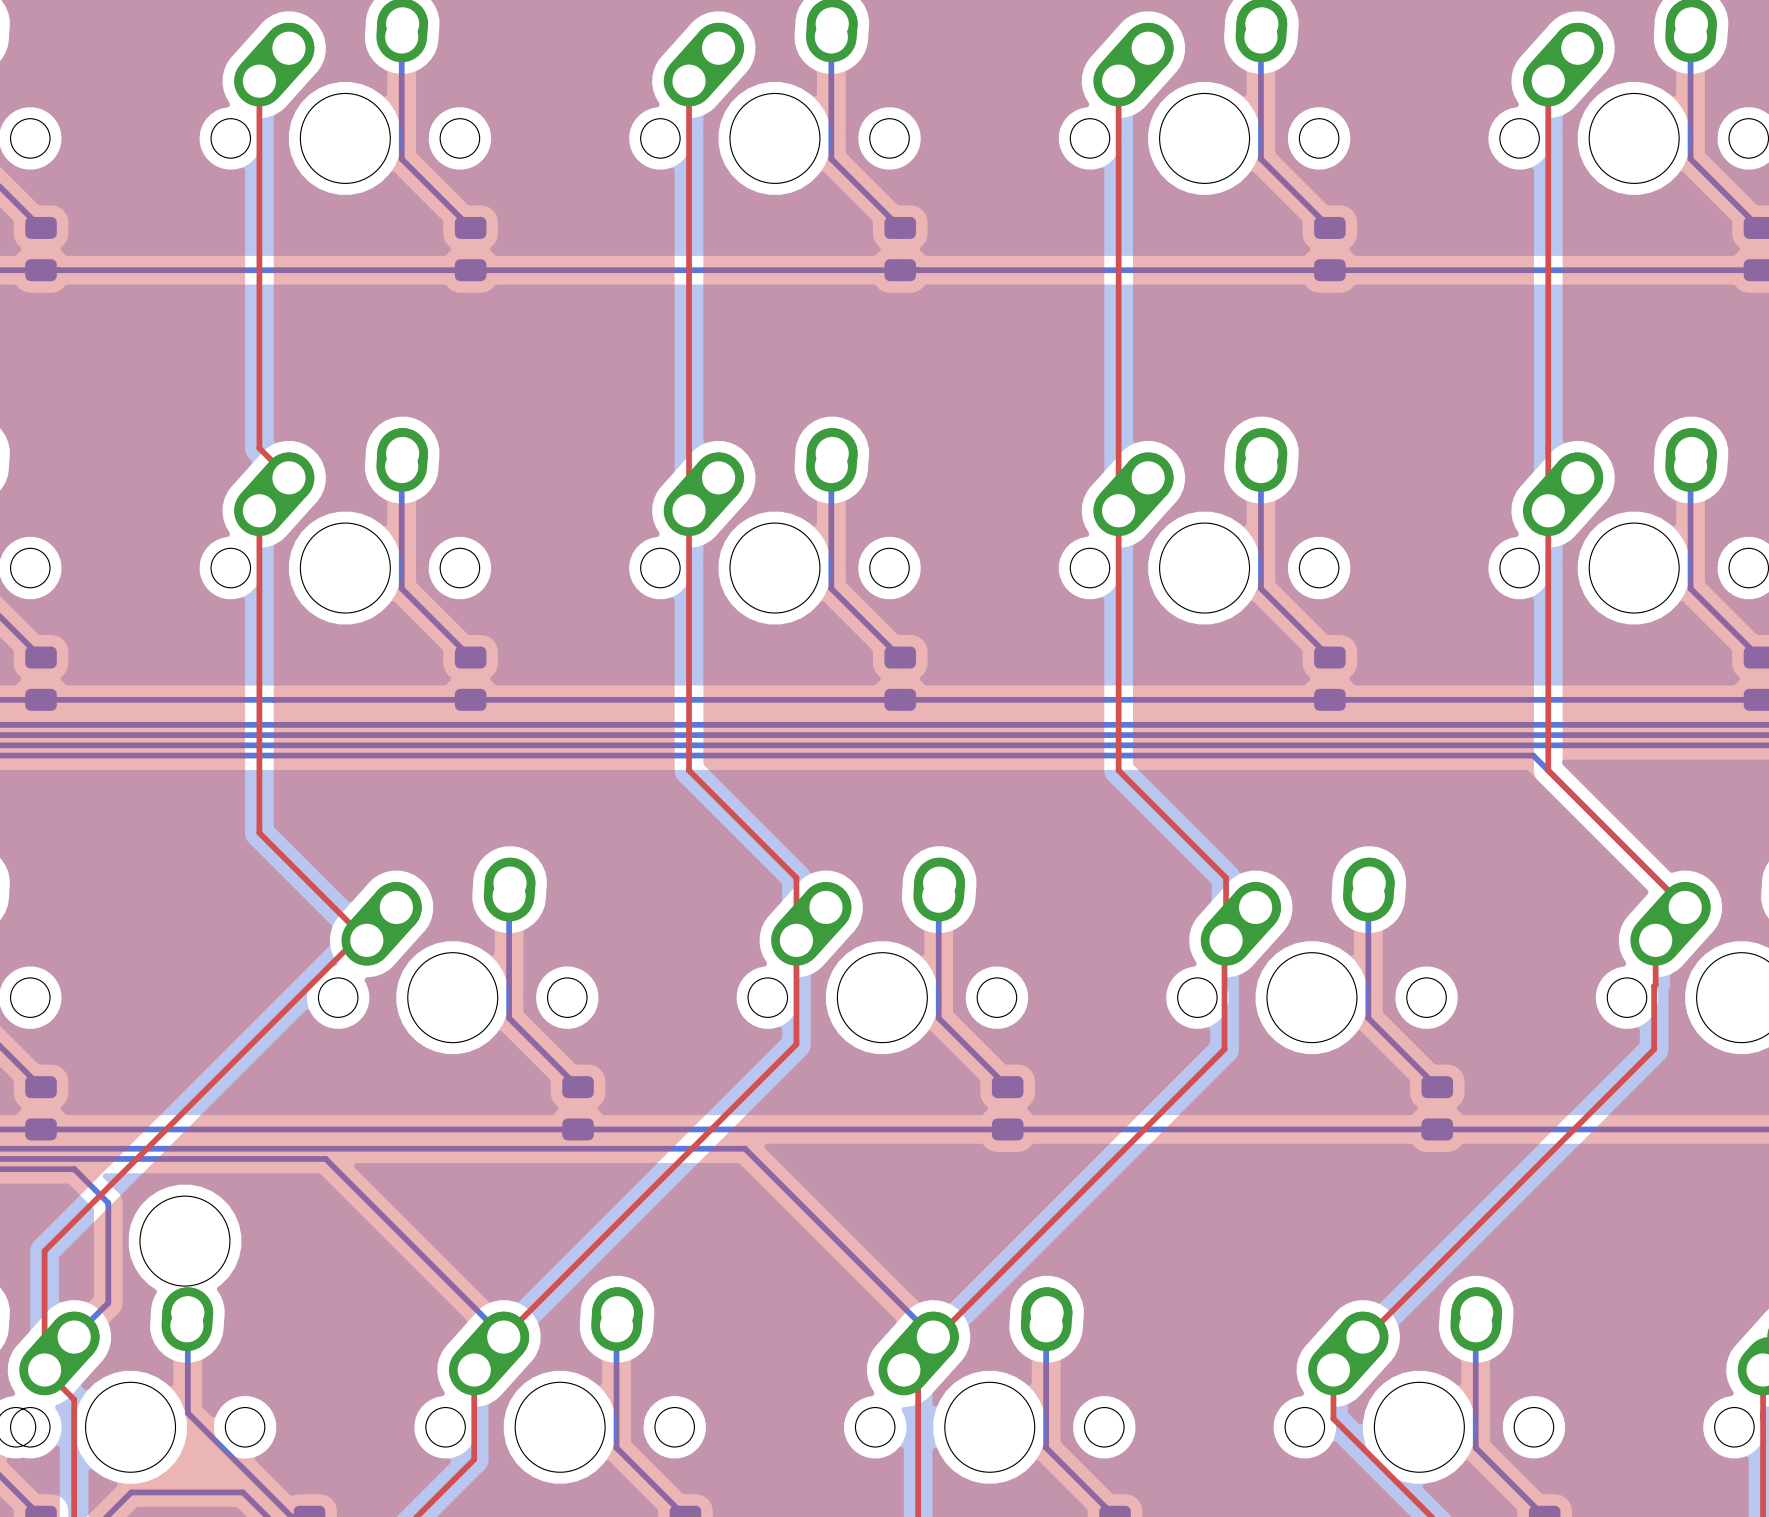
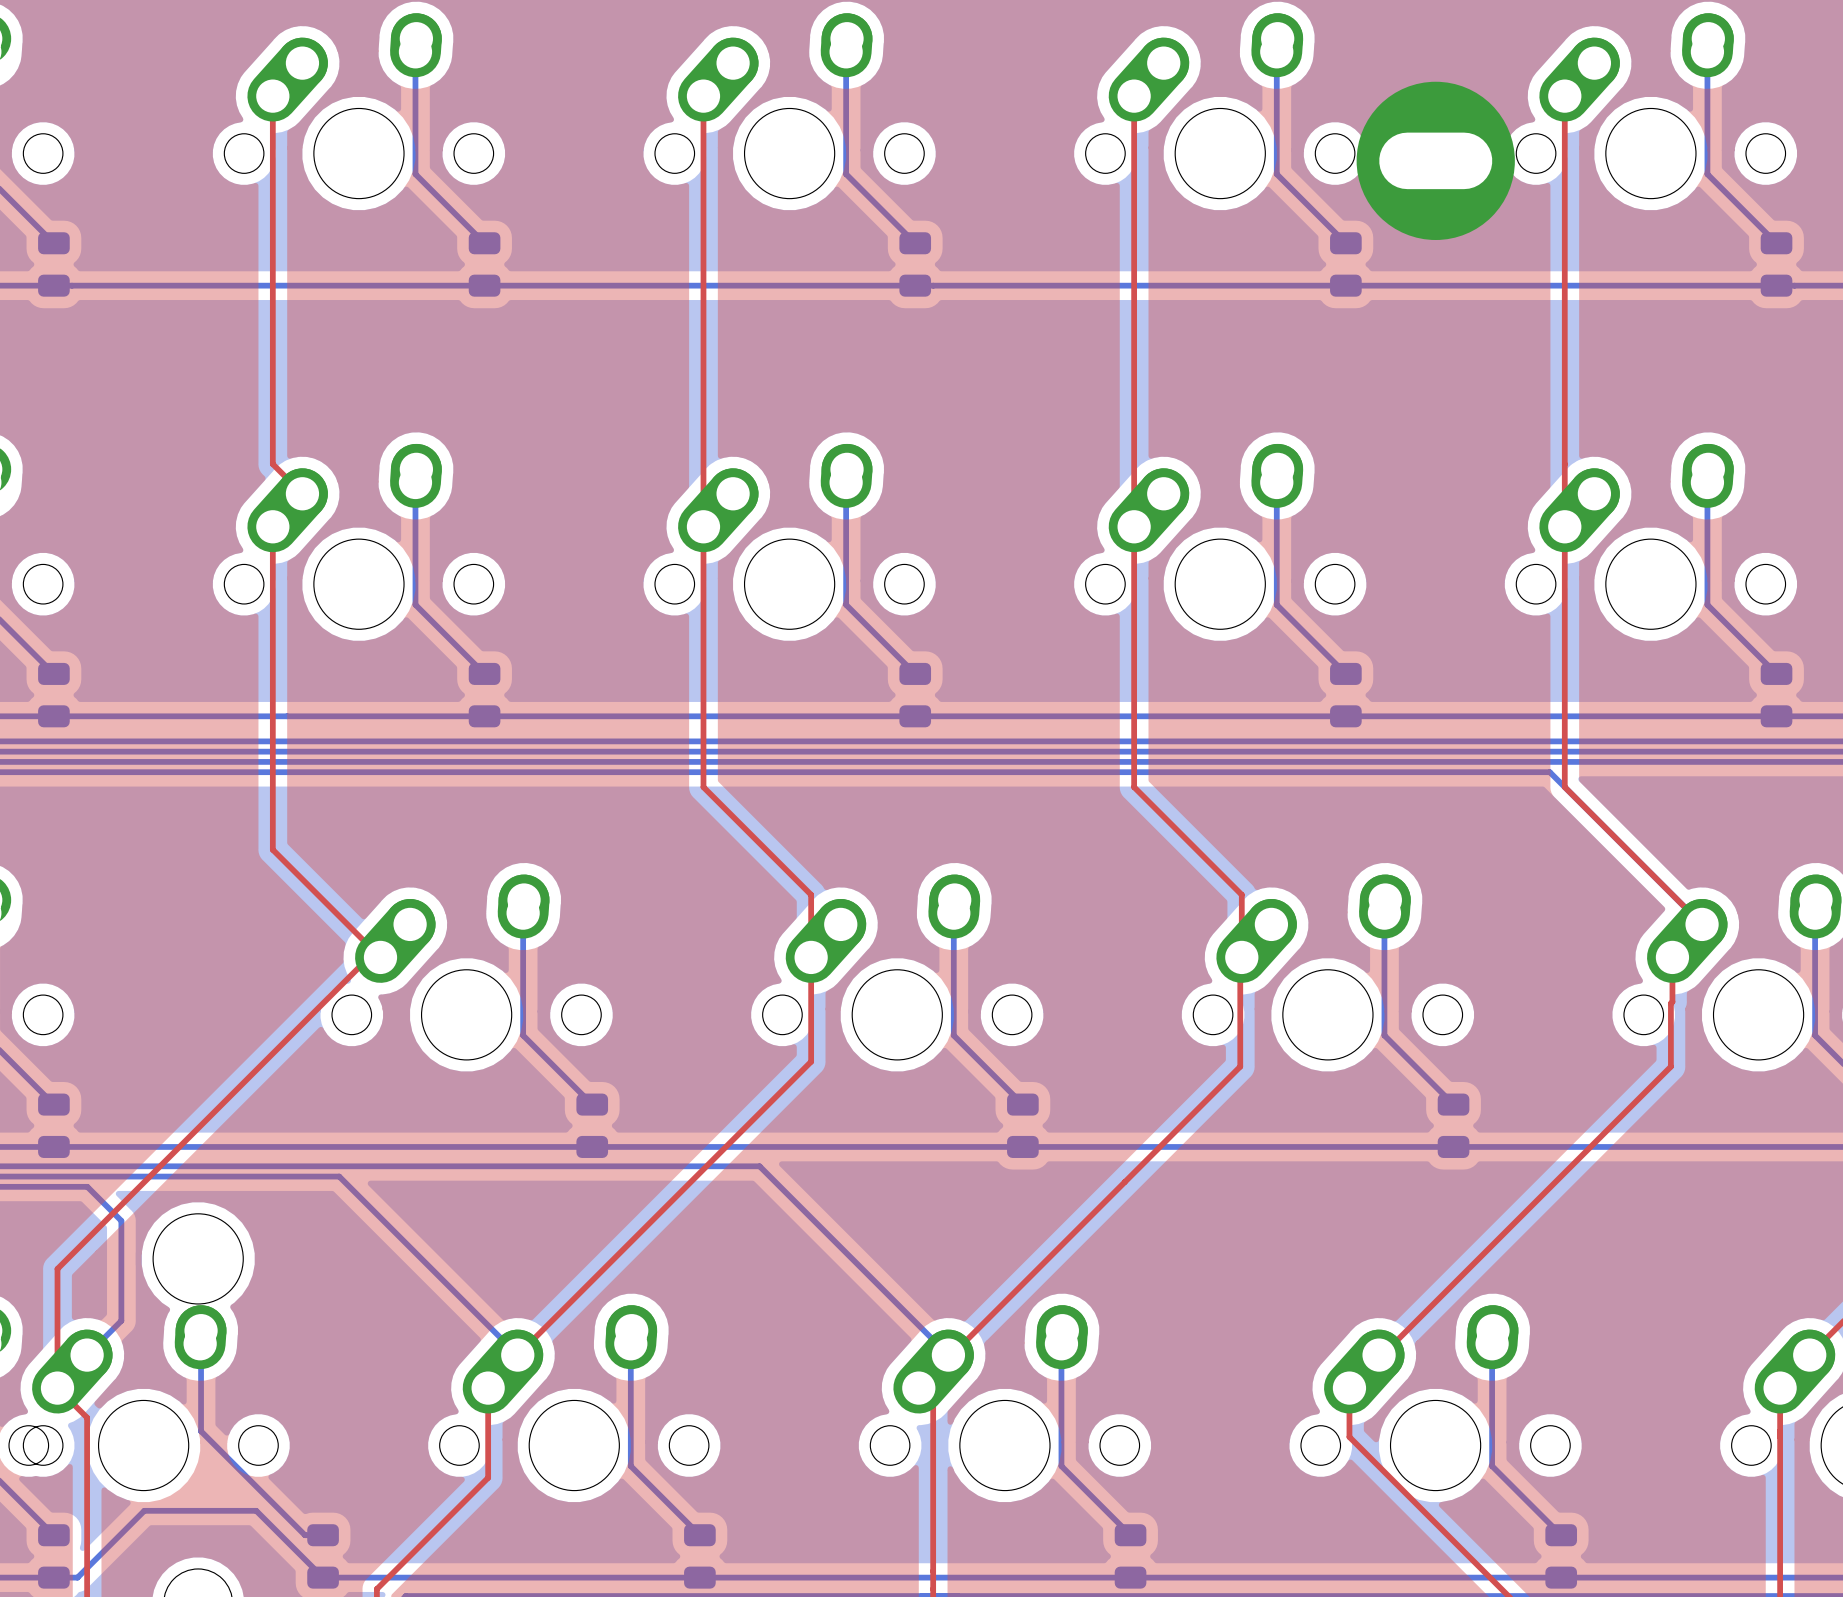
part: none -> (1435, 160)

